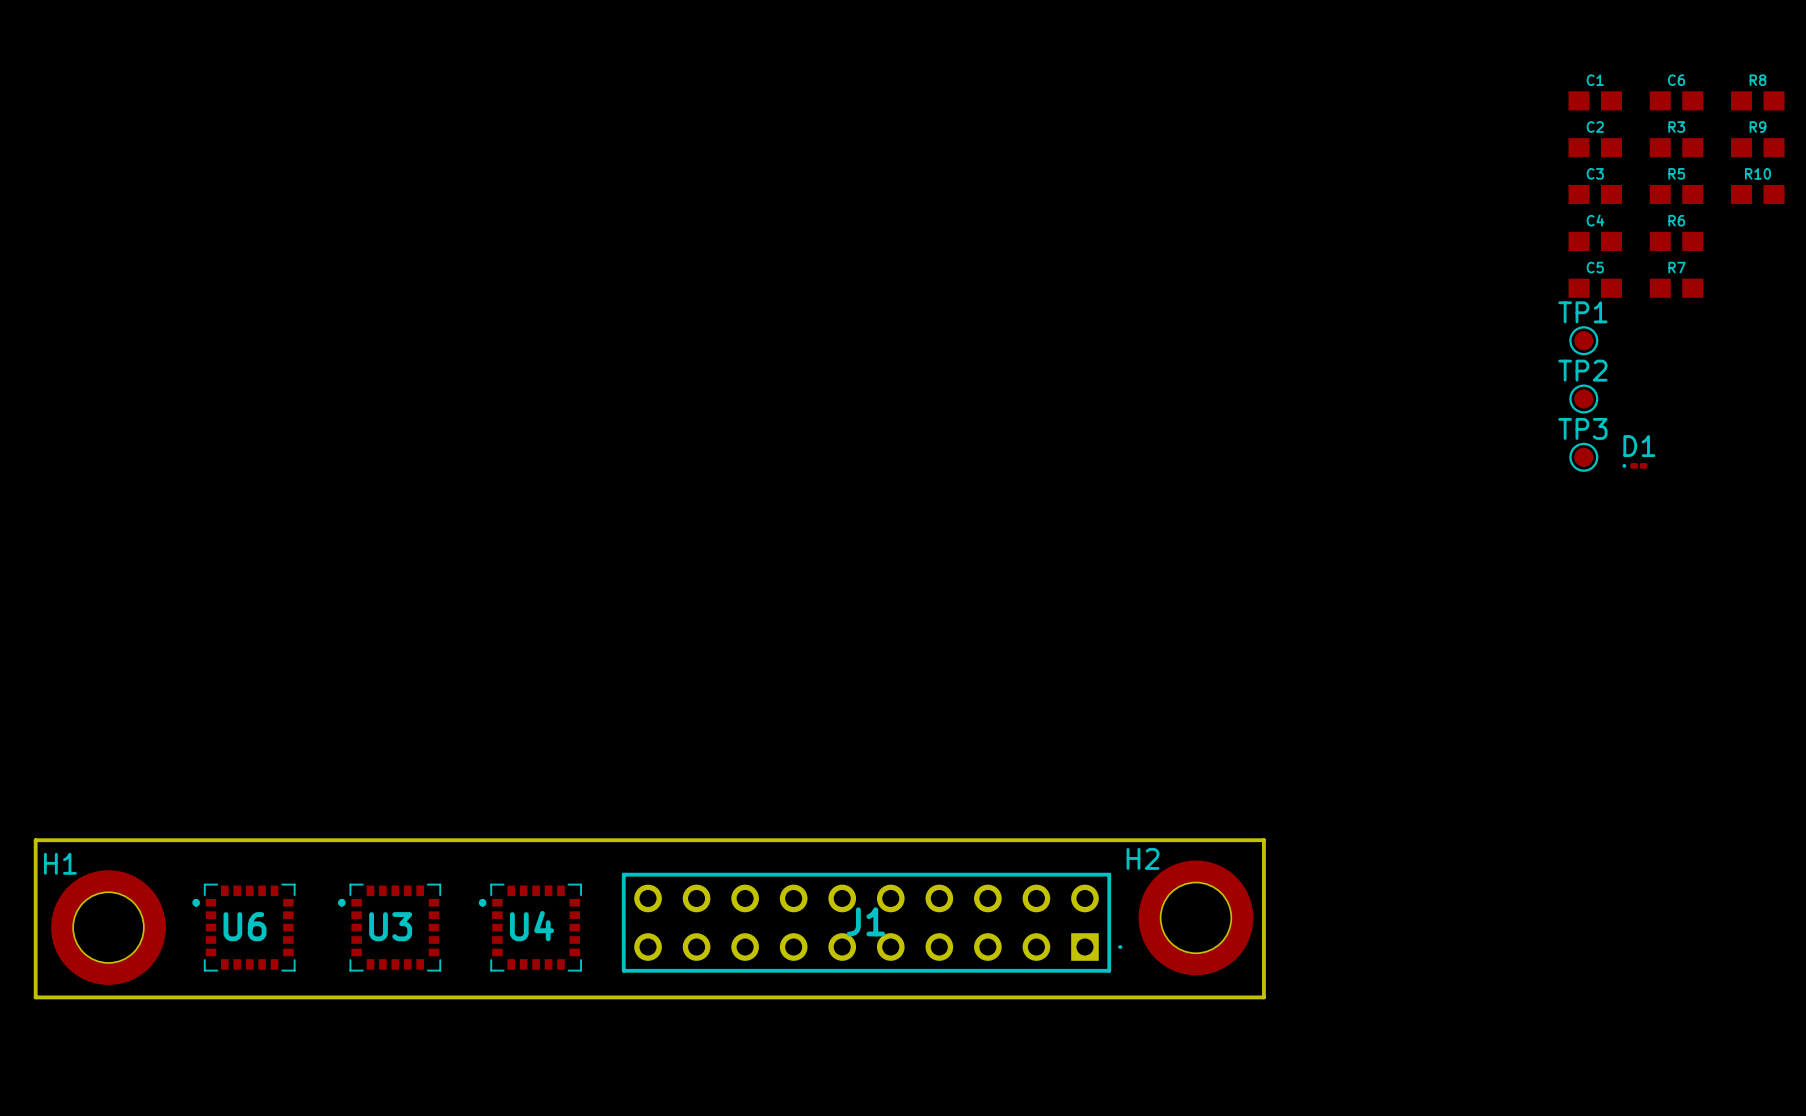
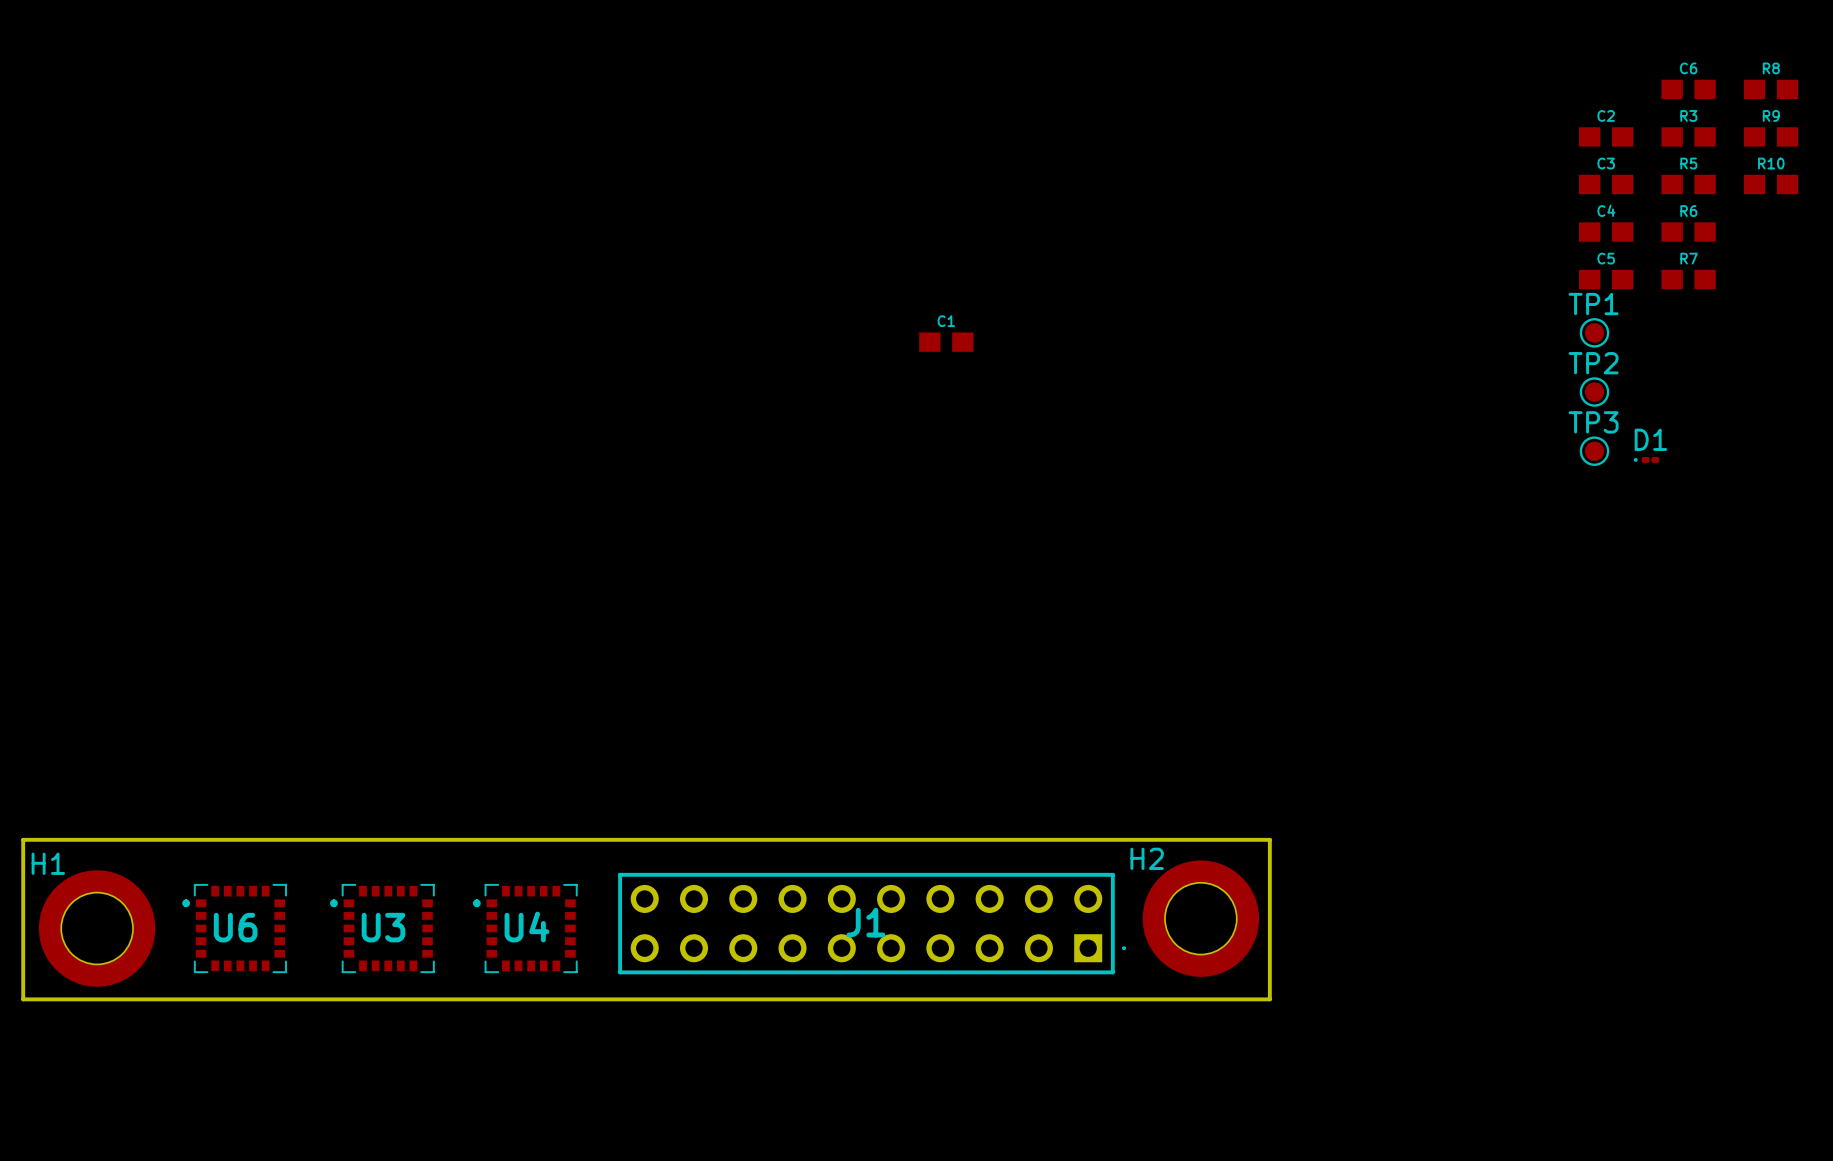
C1 position: (1595, 100) -> (946, 342)

